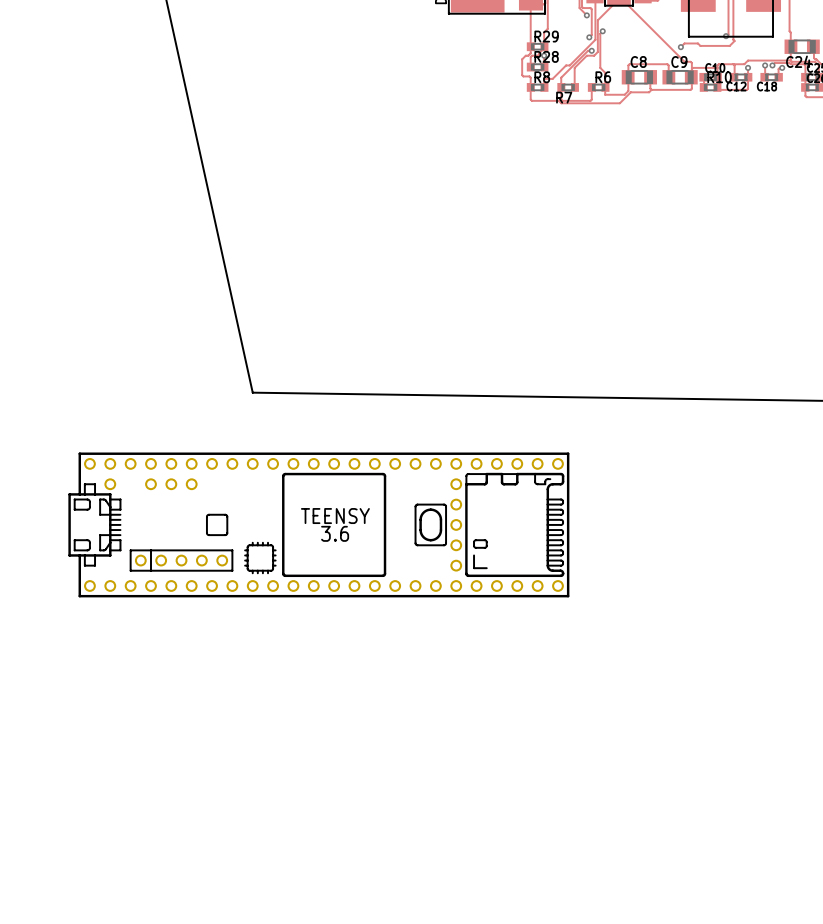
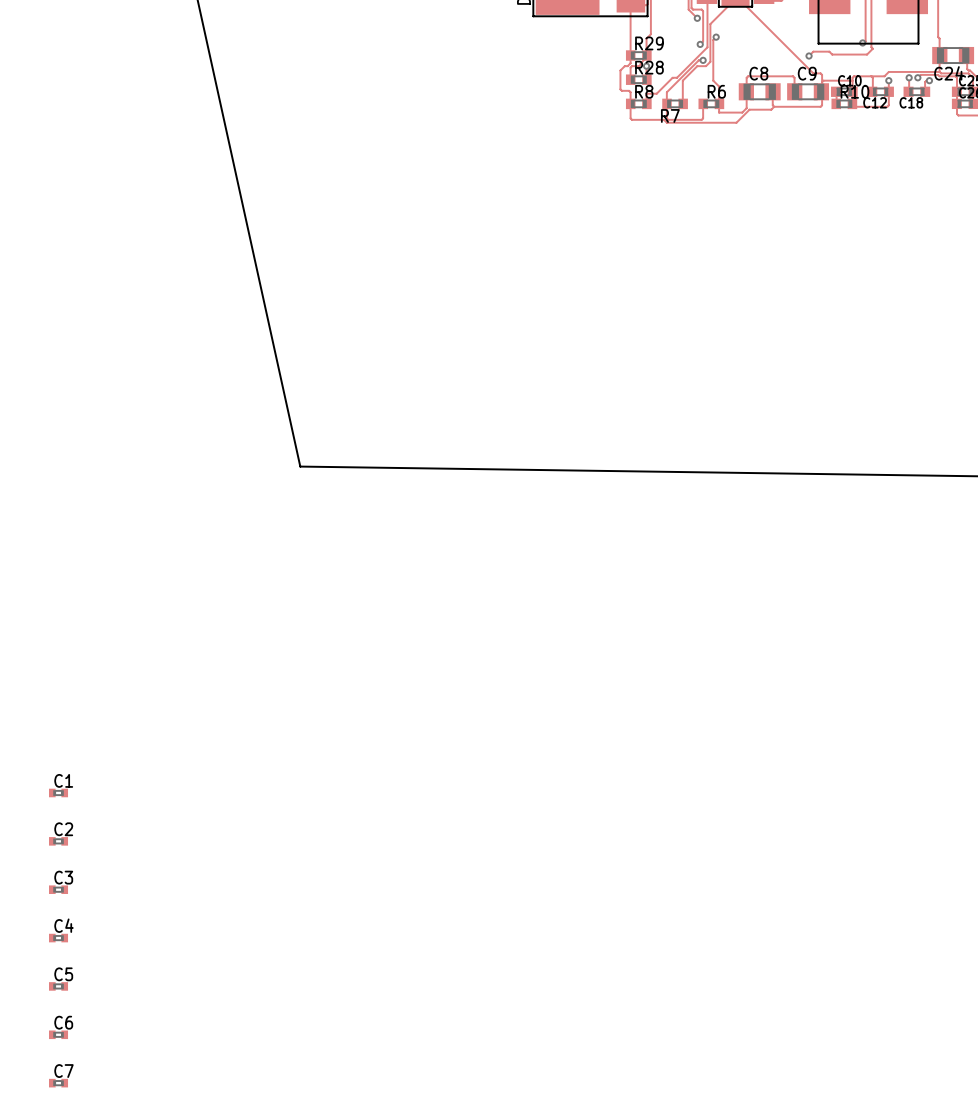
part: (318, 524) -> none
C1: none -> (58, 792)
C2: none -> (58, 841)
C3: none -> (58, 889)
C4: none -> (58, 938)
C5: none -> (58, 986)
C6: none -> (58, 1034)
C7: none -> (58, 1083)

